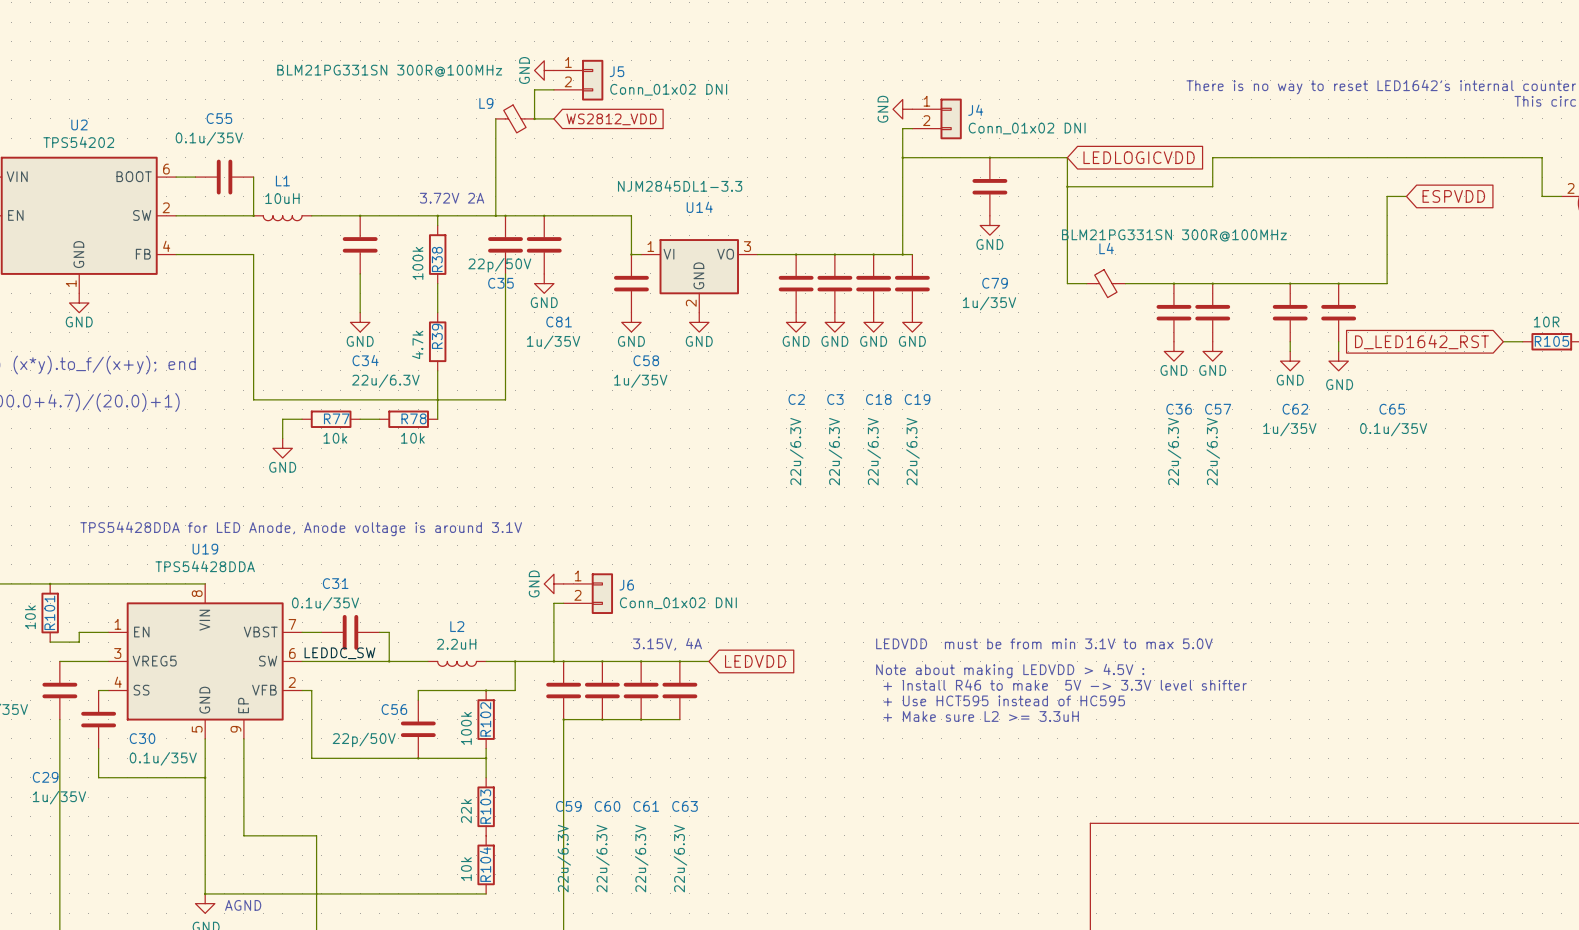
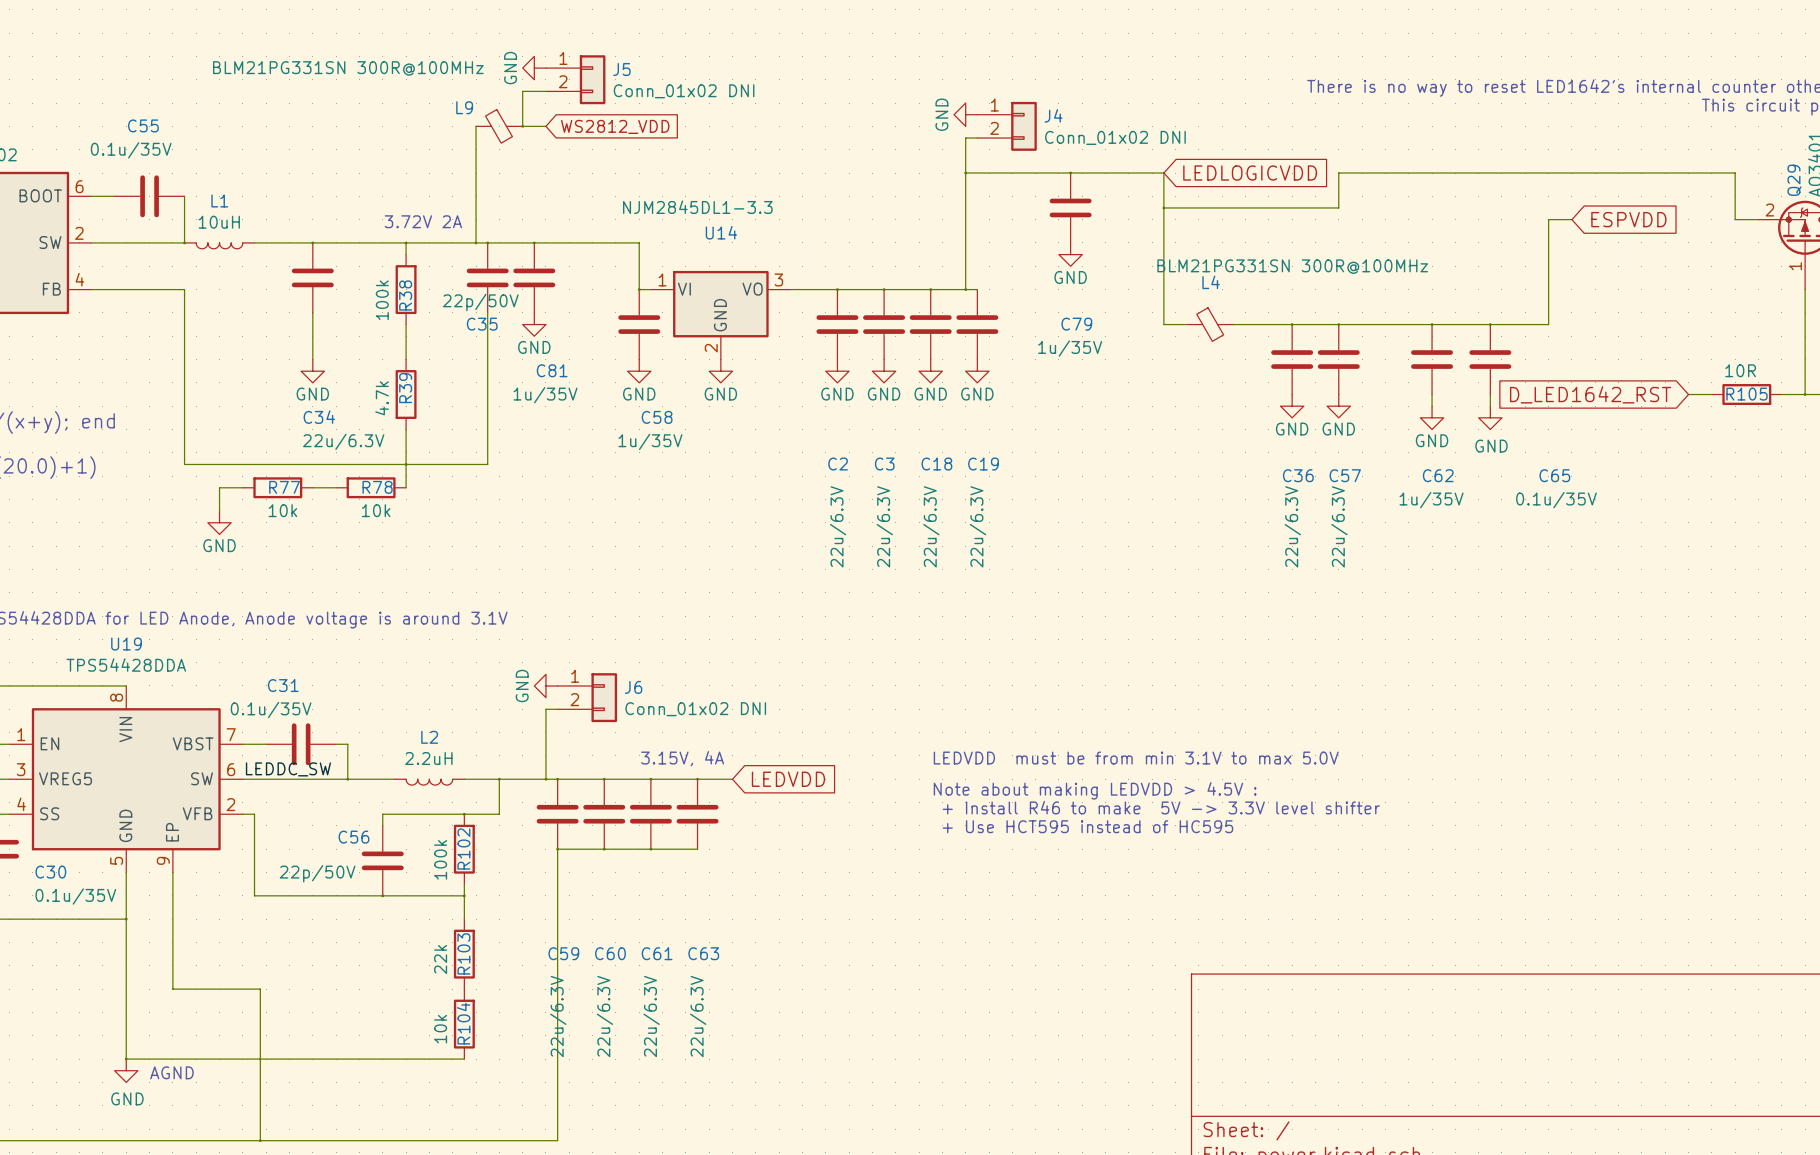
text: + Make sure L2 >= 3.3uH (981, 716) -> none

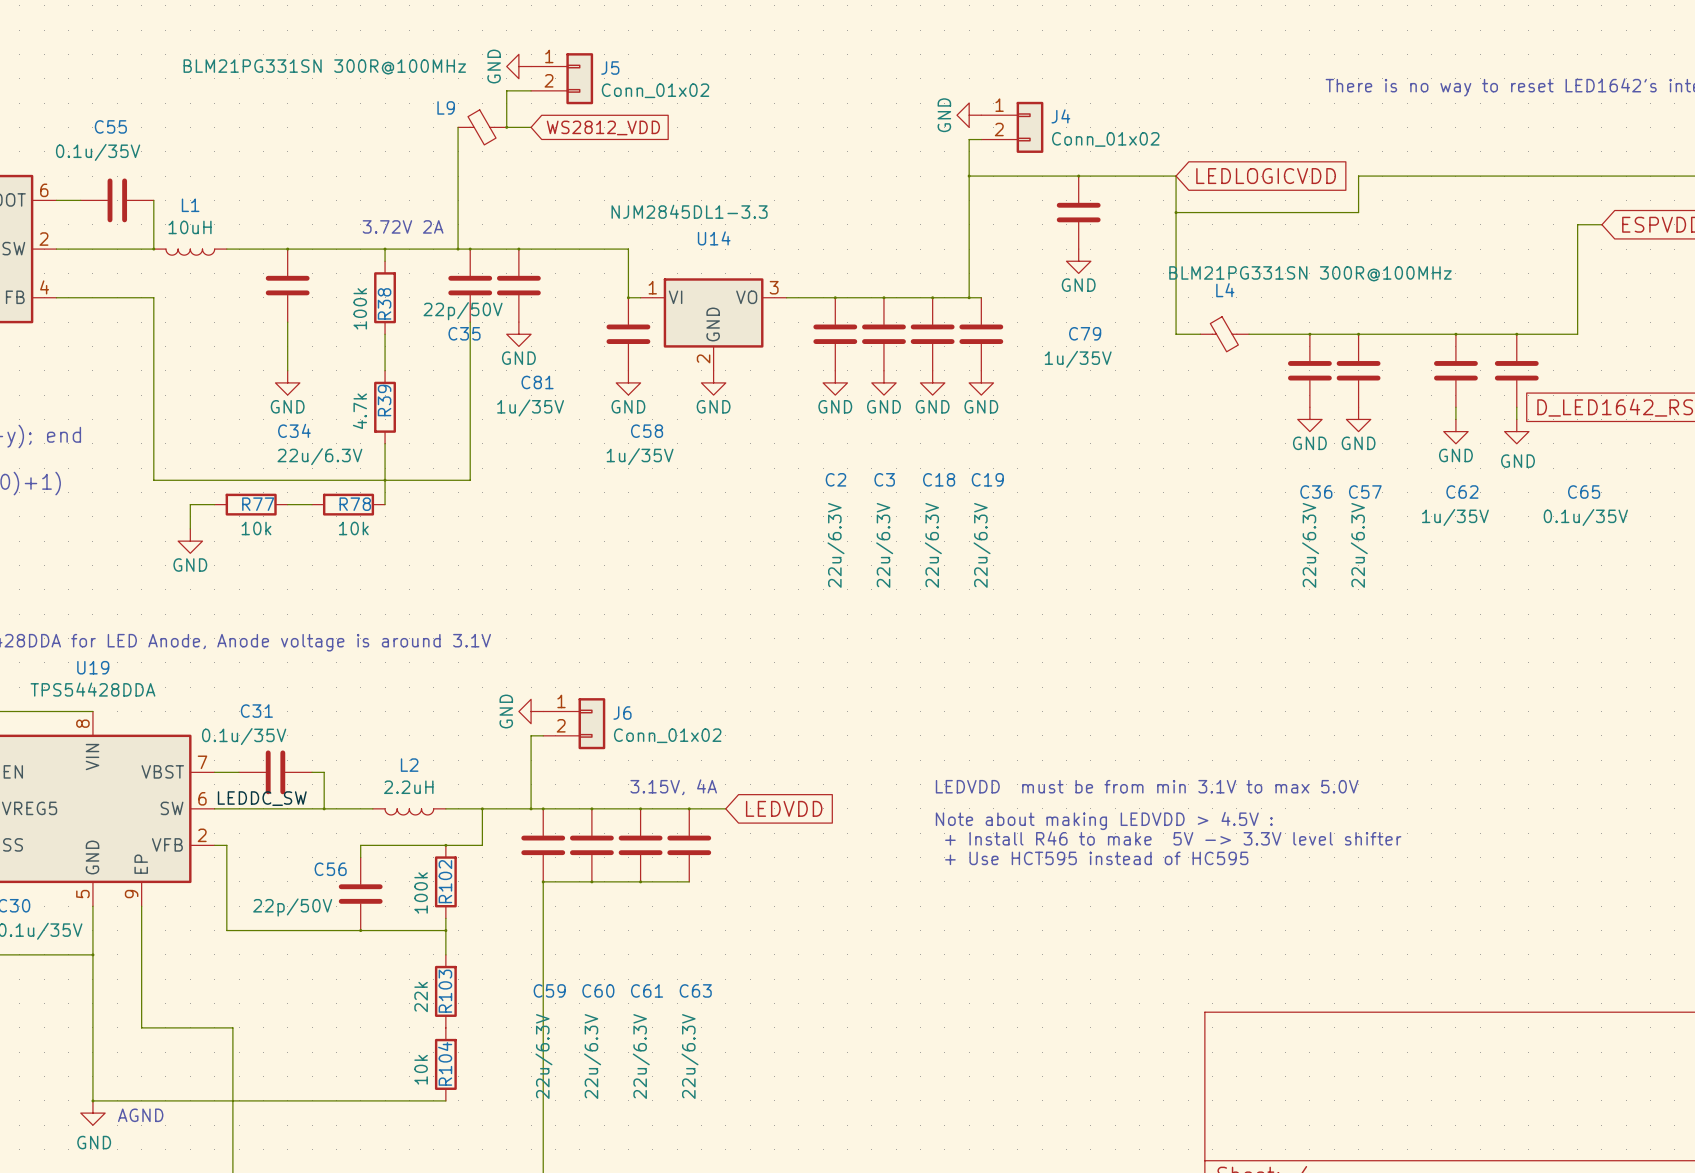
J5 value: Conn_01x02 DNI (684, 91) -> Conn_01x02 (655, 90)
J4 value: Conn_01x02 DNI (1115, 137) -> Conn_01x02 (1105, 139)
J6 value: Conn_01x02 DNI (695, 709) -> Conn_01x02 (667, 735)

